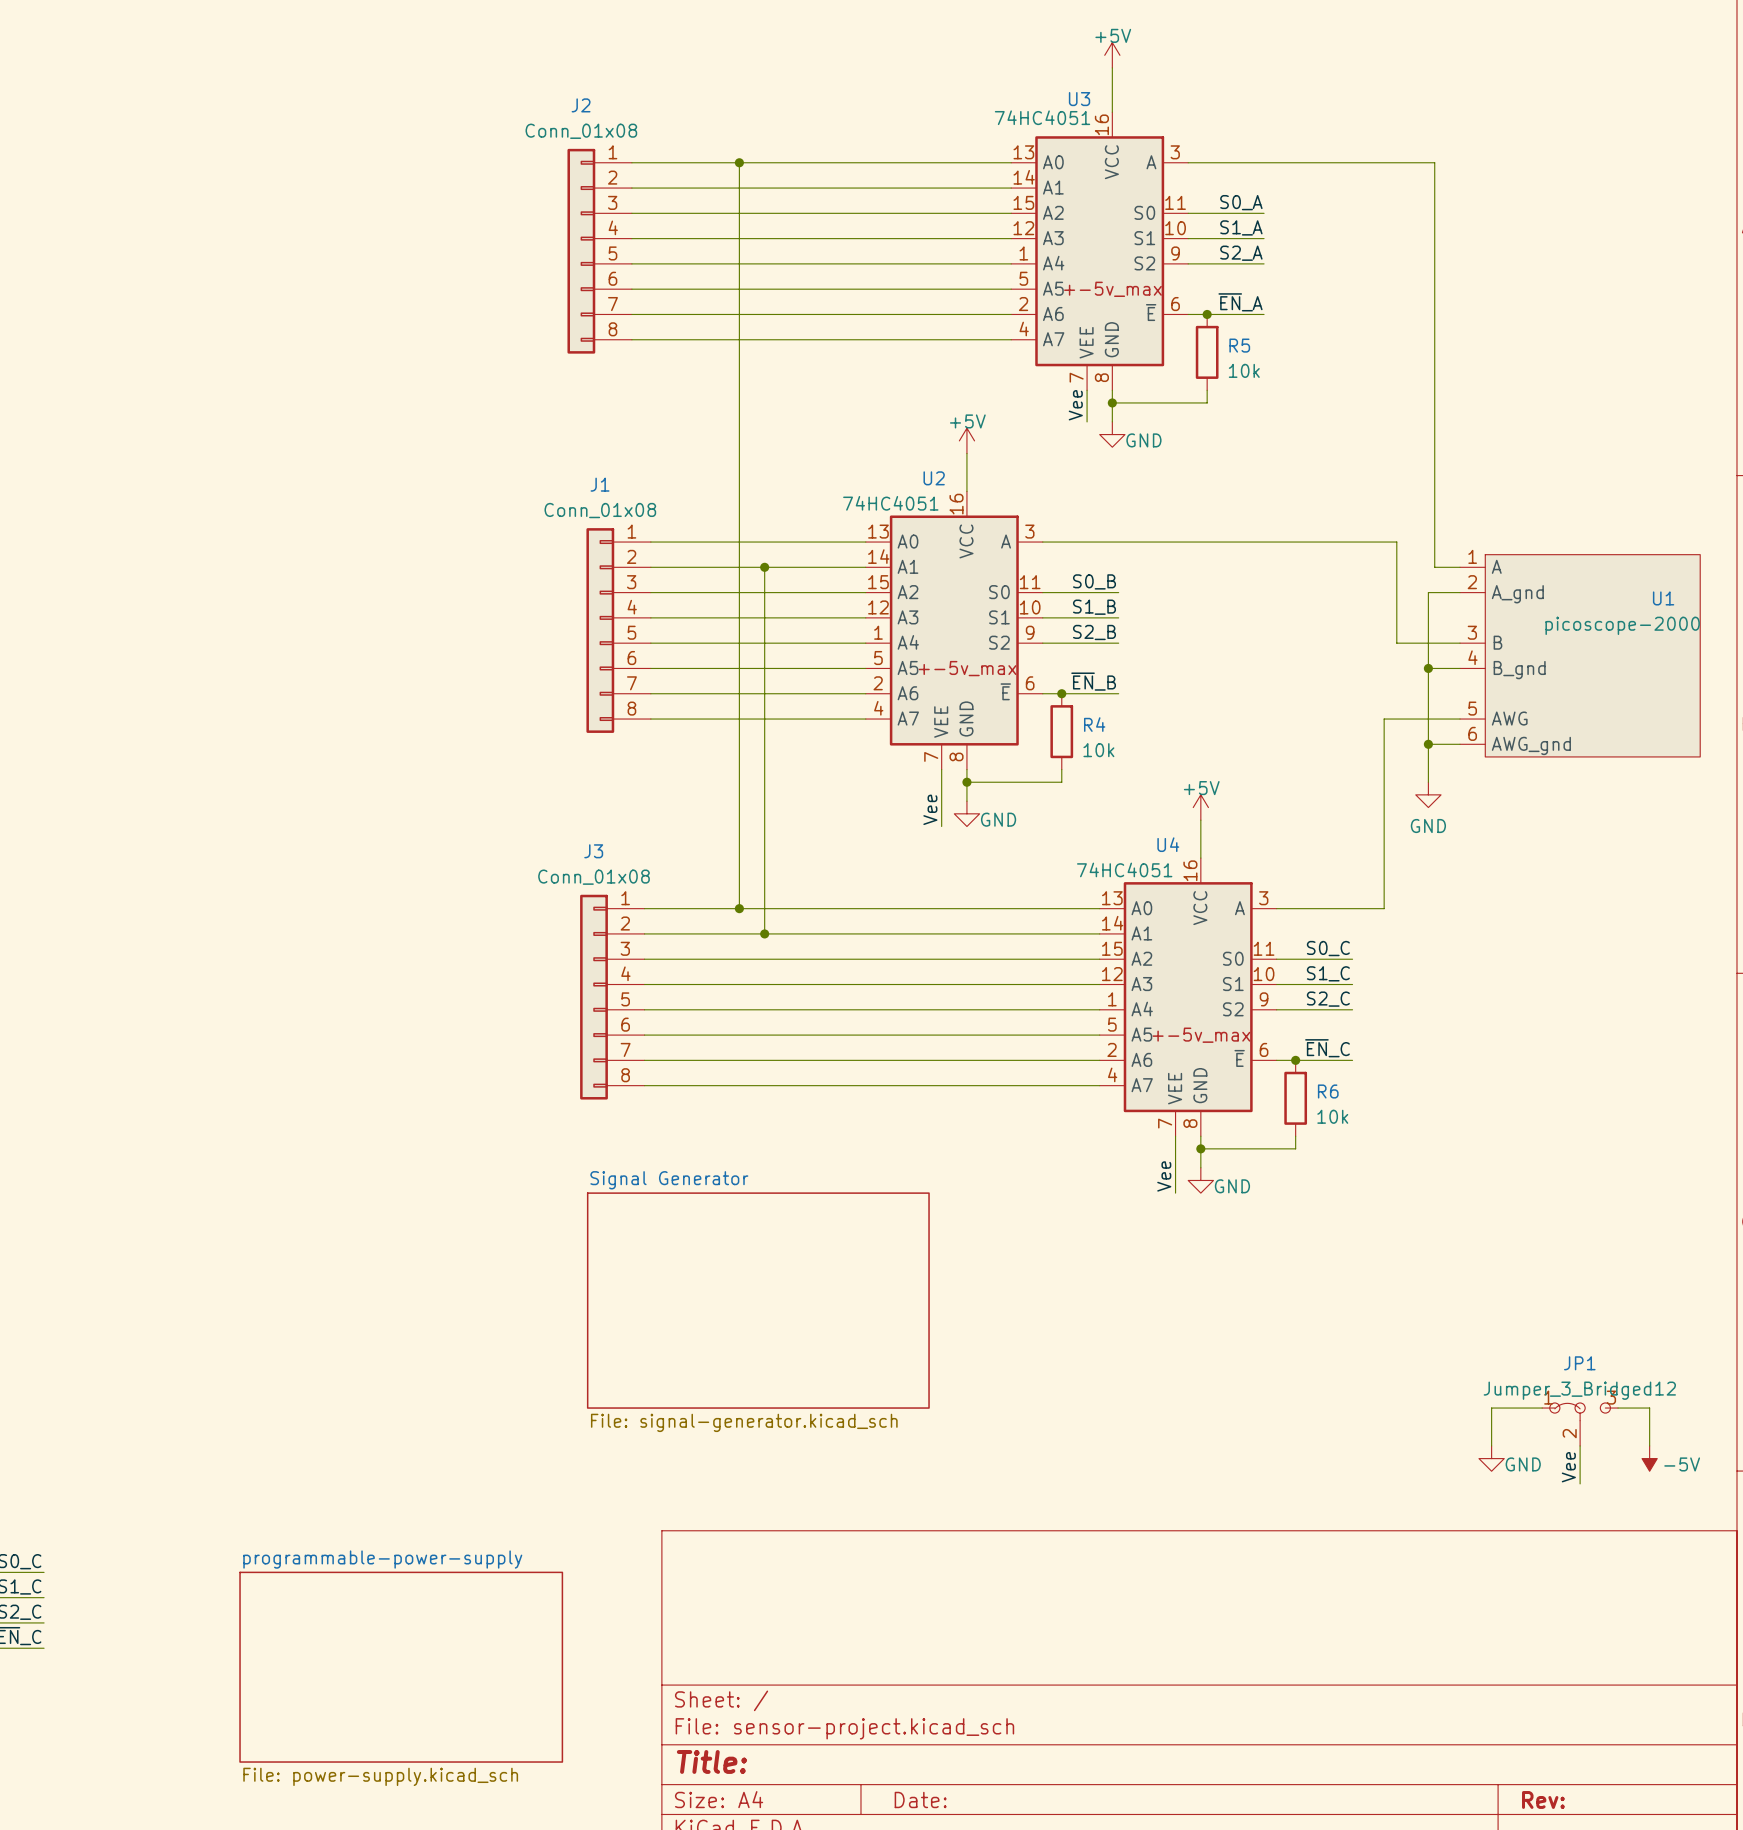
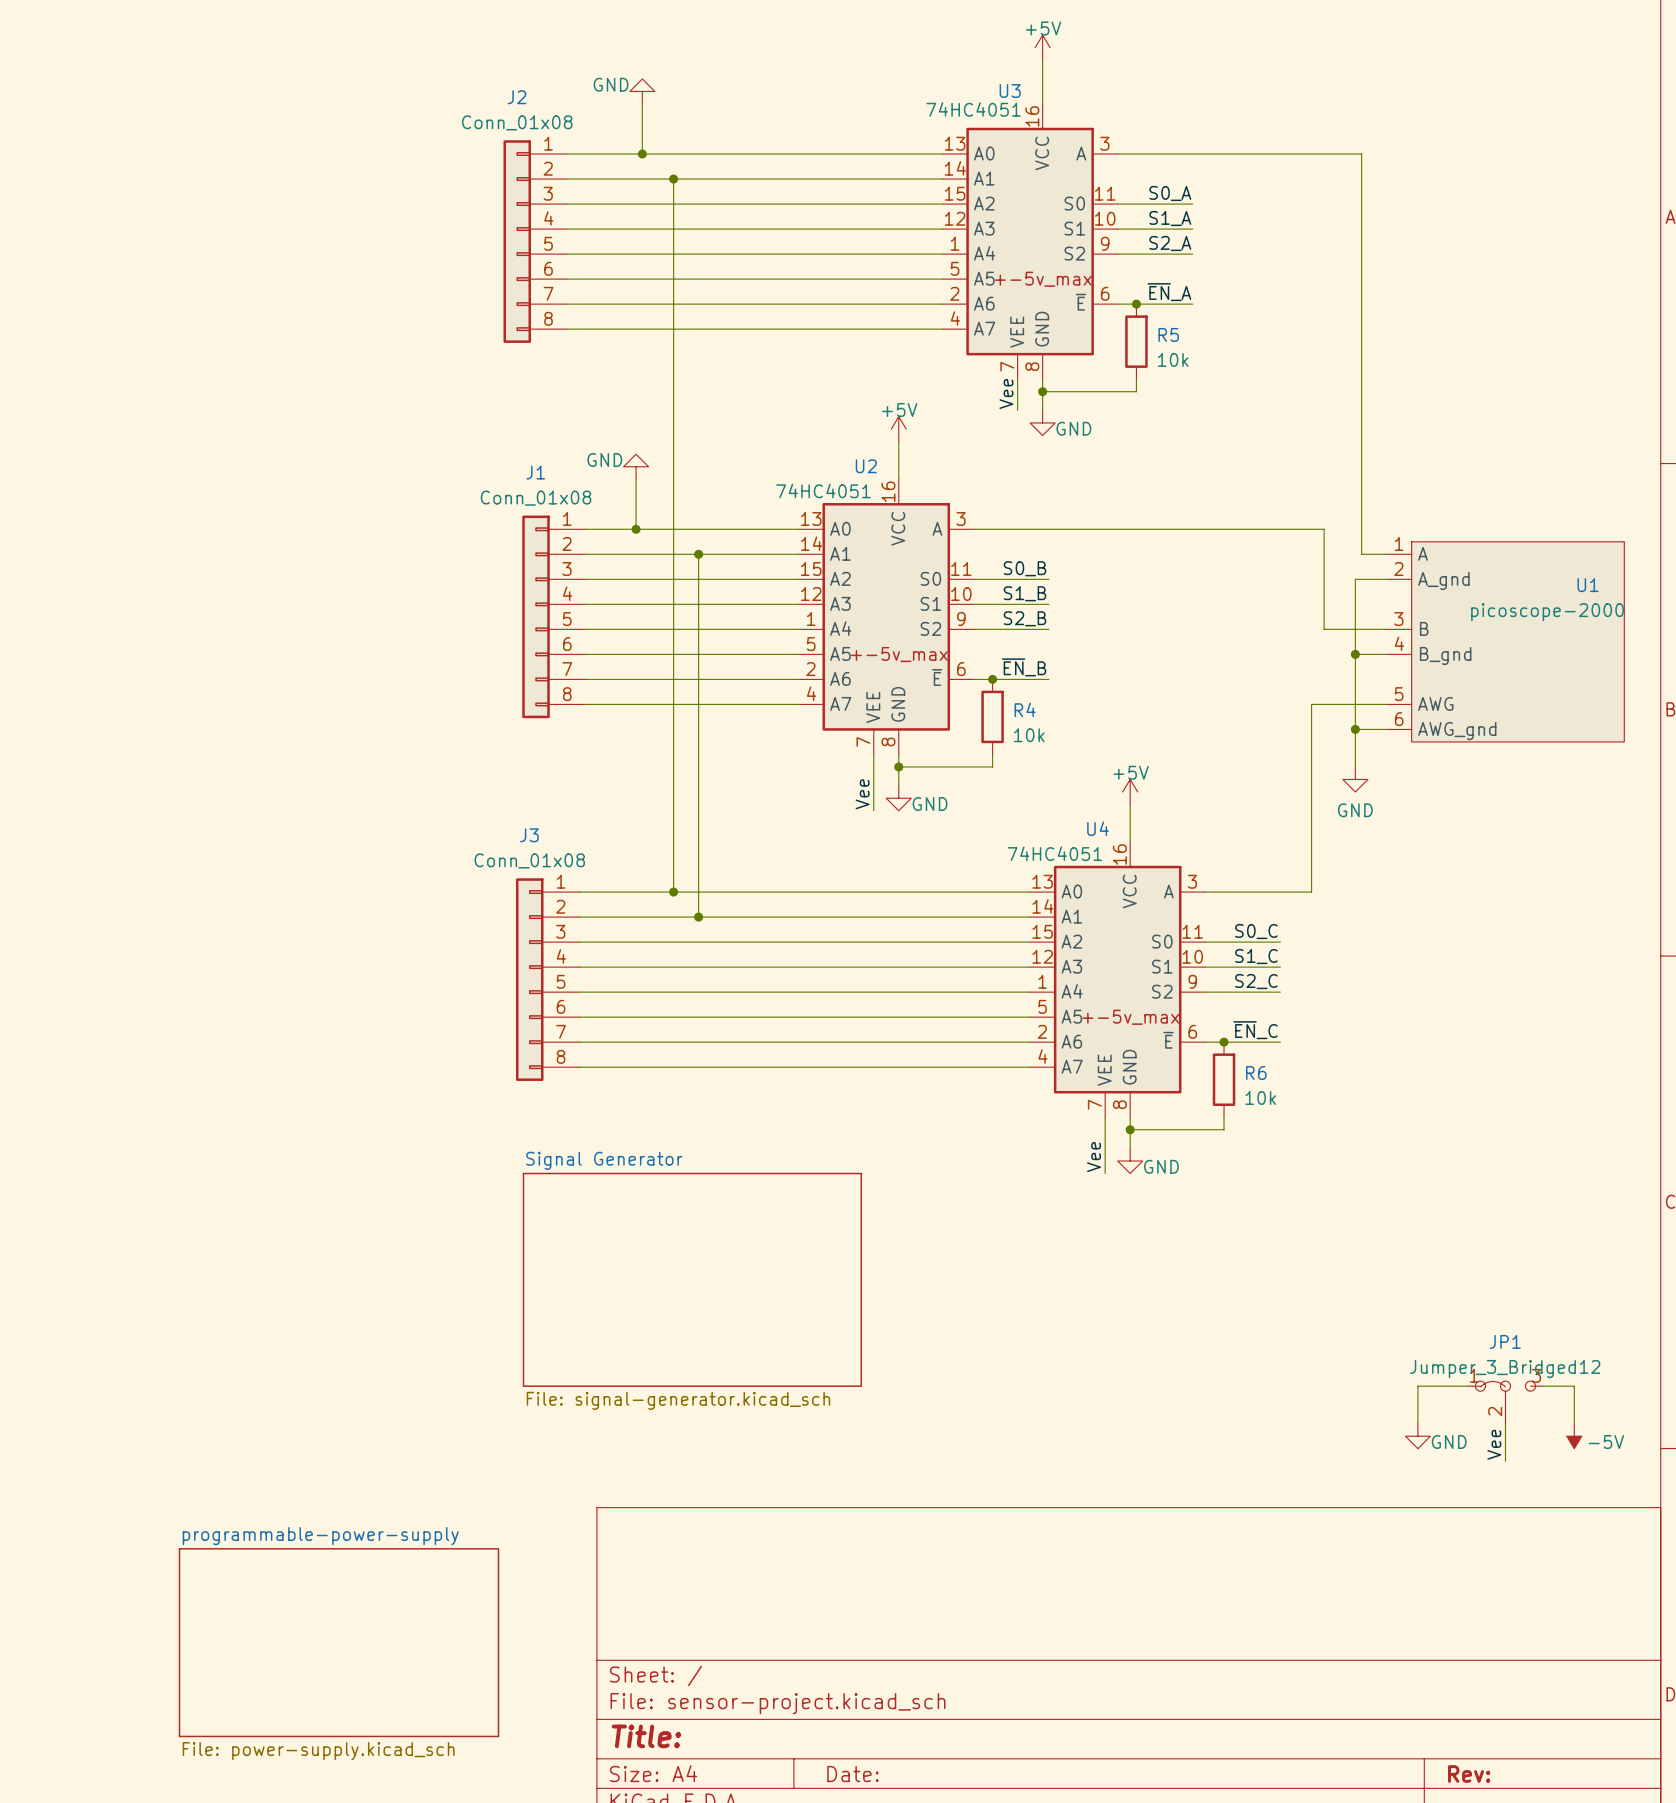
power symbol: none -> GND (642, 91)
wire: none -> (642, 103) (642, 154)
junction: none -> (642, 154)
wire: (739, 162) (739, 188) -> none
junction: (739, 162) -> none
junction: none -> (673, 179)
power symbol: none -> GND (636, 466)
wire: none -> (636, 479) (636, 529)
junction: none -> (636, 529)

